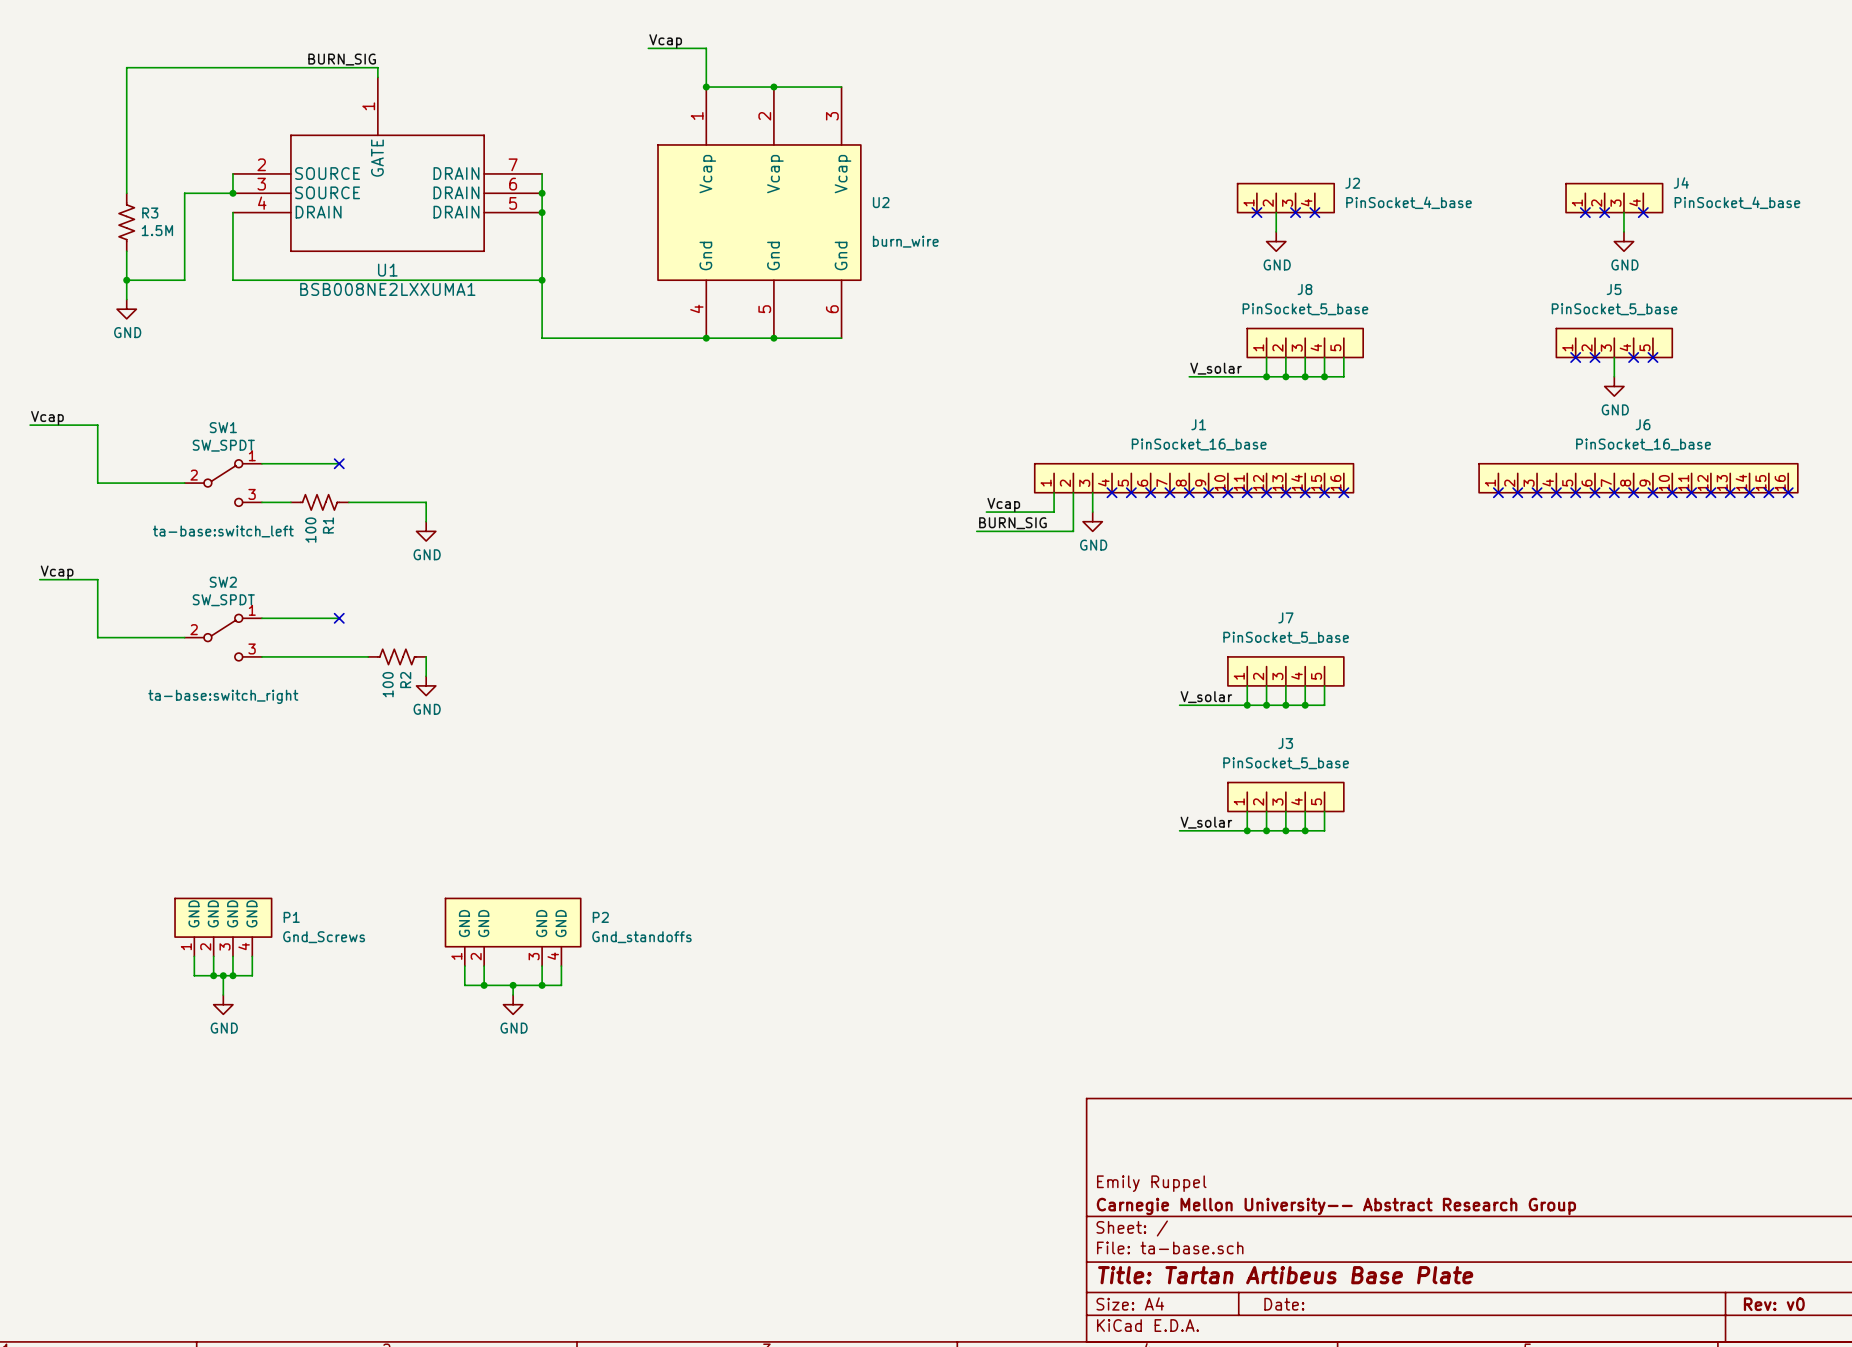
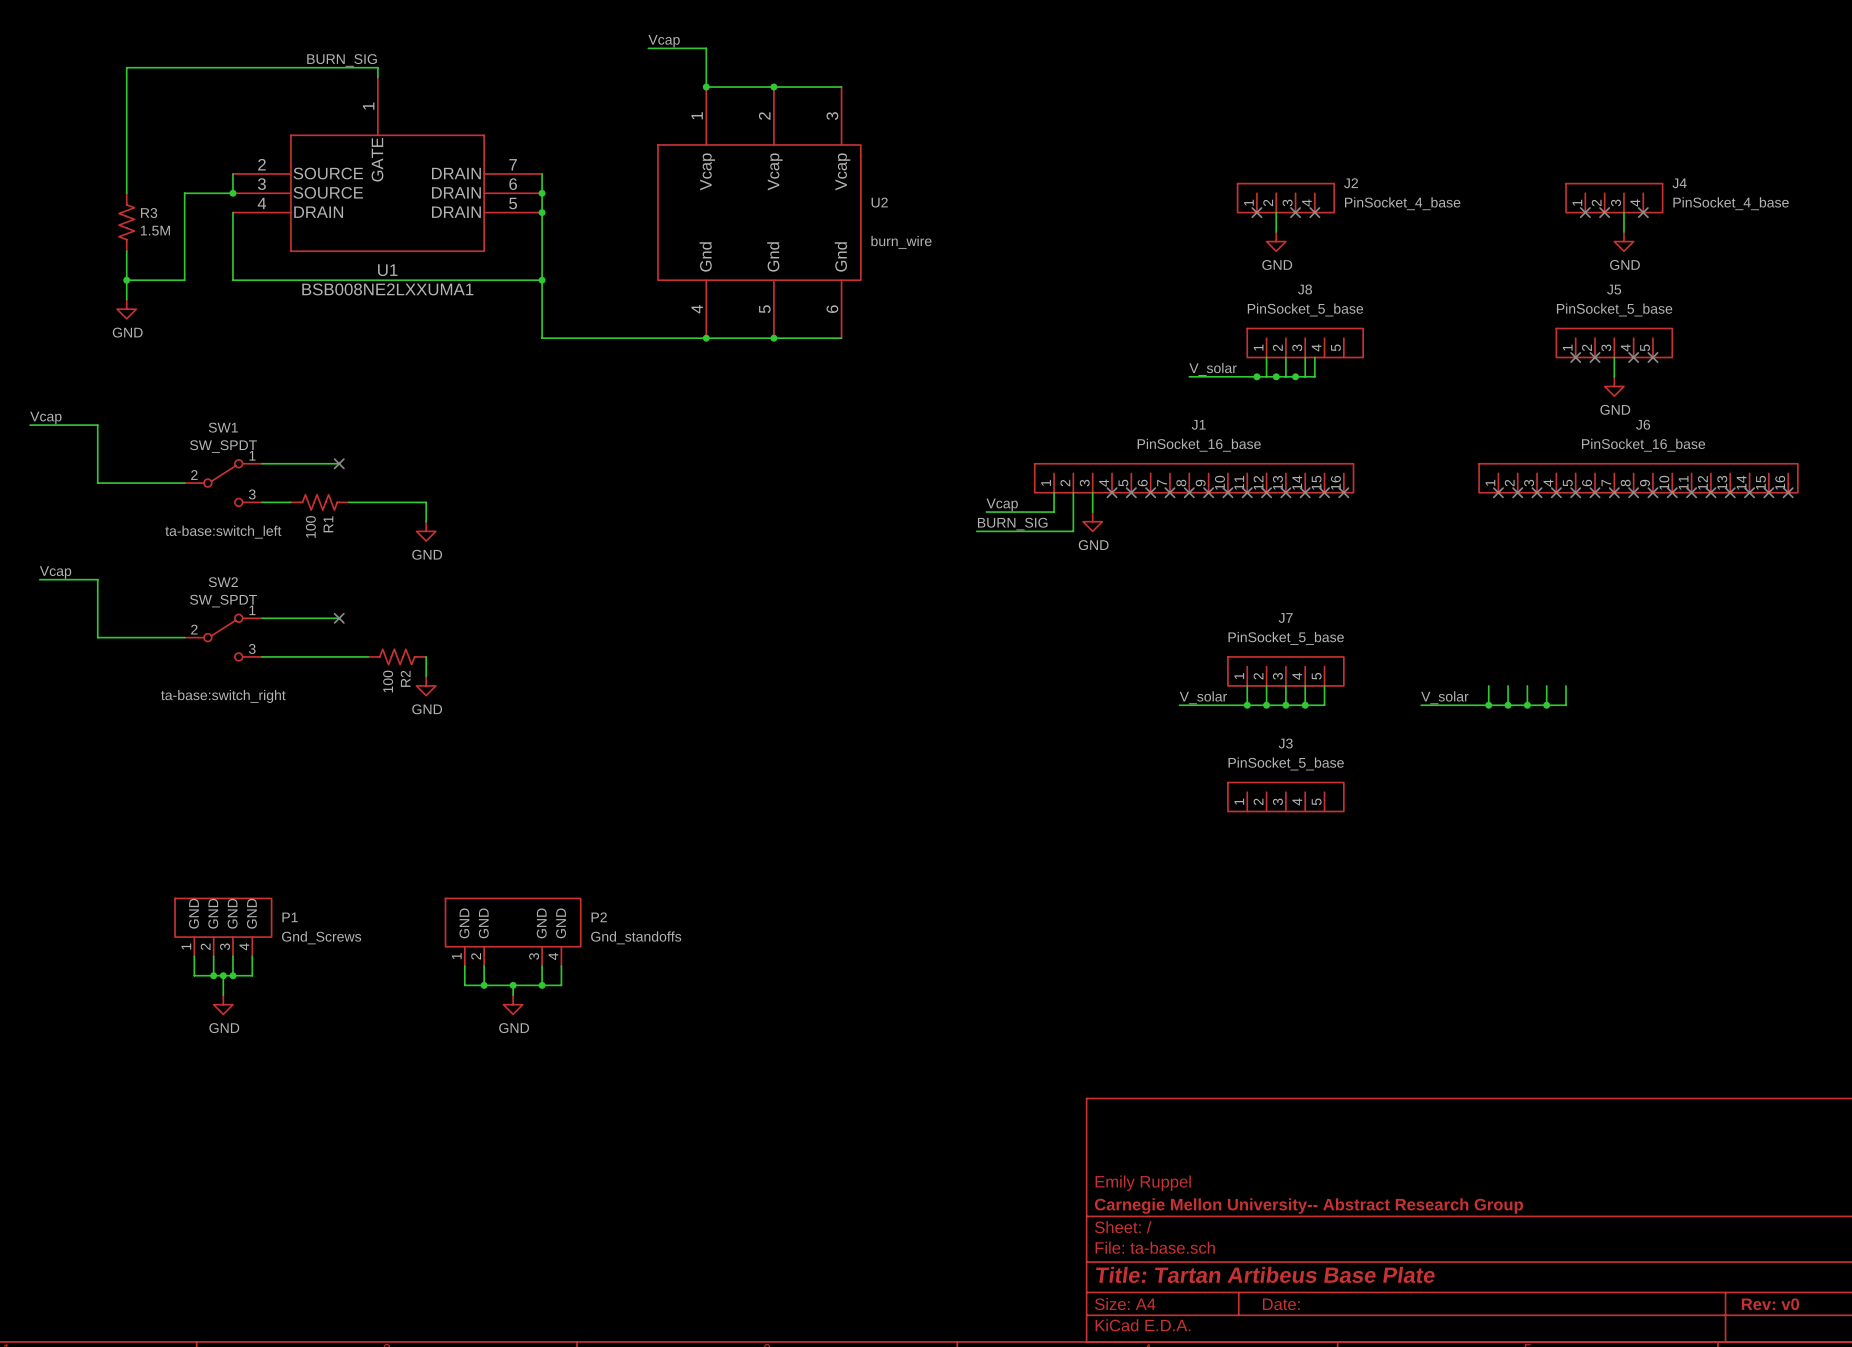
wire: (1324, 357) (1324, 376) -> none
wire: (1343, 357) (1343, 376) (1314, 376) -> (1314, 357) (1314, 376)
junction: none -> (1256, 376)
junction: (1266, 376) -> none
junction: none -> (1276, 376)
junction: (1285, 376) -> none
junction: none -> (1295, 376)
junction: (1305, 376) -> none
junction: (1324, 376) -> none
wire: none -> (1488, 685) (1488, 705)
wire: none -> (1508, 685) (1508, 705)
wire: none -> (1527, 685) (1527, 705)
wire: none -> (1546, 685) (1546, 705)
wire: none -> (1566, 685) (1566, 705) (1421, 705)
label: none -> V_solar (1444, 697)
junction: none -> (1488, 705)
junction: none -> (1508, 705)
junction: none -> (1527, 705)
junction: none -> (1546, 705)
wire: (1247, 811) (1247, 830) -> none
wire: (1266, 811) (1266, 830) -> none
wire: (1285, 811) (1285, 830) -> none
wire: (1305, 811) (1305, 830) -> none
wire: (1324, 811) (1324, 830) (1179, 830) -> none
label: V_solar (1206, 822) -> none
junction: (1247, 830) -> none
junction: (1266, 830) -> none
junction: (1285, 830) -> none
junction: (1305, 830) -> none

